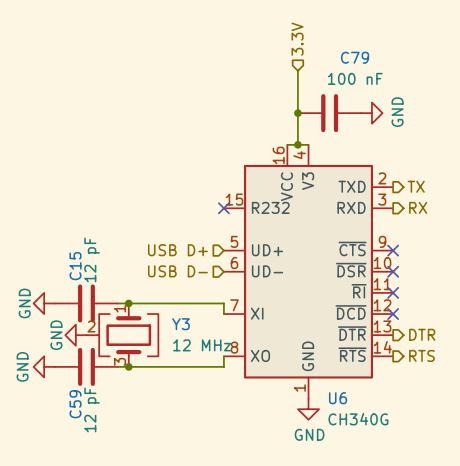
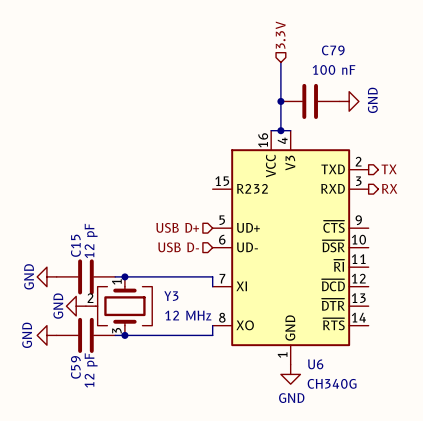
no-connect mark: (223, 208) -> none
no-connect mark: (393, 250) -> none
no-connect mark: (393, 271) -> none
no-connect mark: (393, 292) -> none
no-connect mark: (393, 314) -> none
hierarchical label: DTR (422, 334) -> none
hierarchical label: RTS (421, 355) -> none

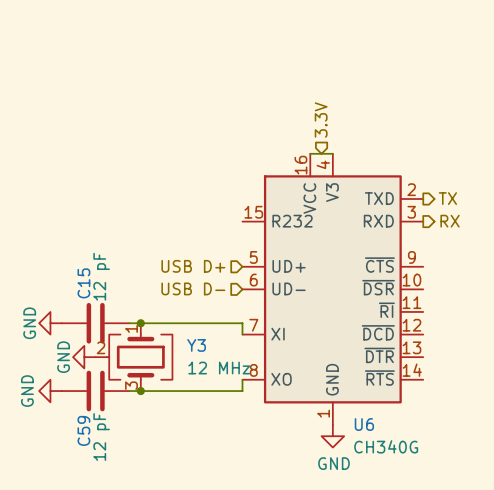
hierarchical label position: 3.3V (280, 35) -> 3.3V (321, 120)
wire: (280, 62) (280, 130) -> none
junction: (280, 101) -> none
C79: 100 nF (310, 101) -> none
power symbol: GND (349, 101) -> none
junction: (280, 130) -> none

